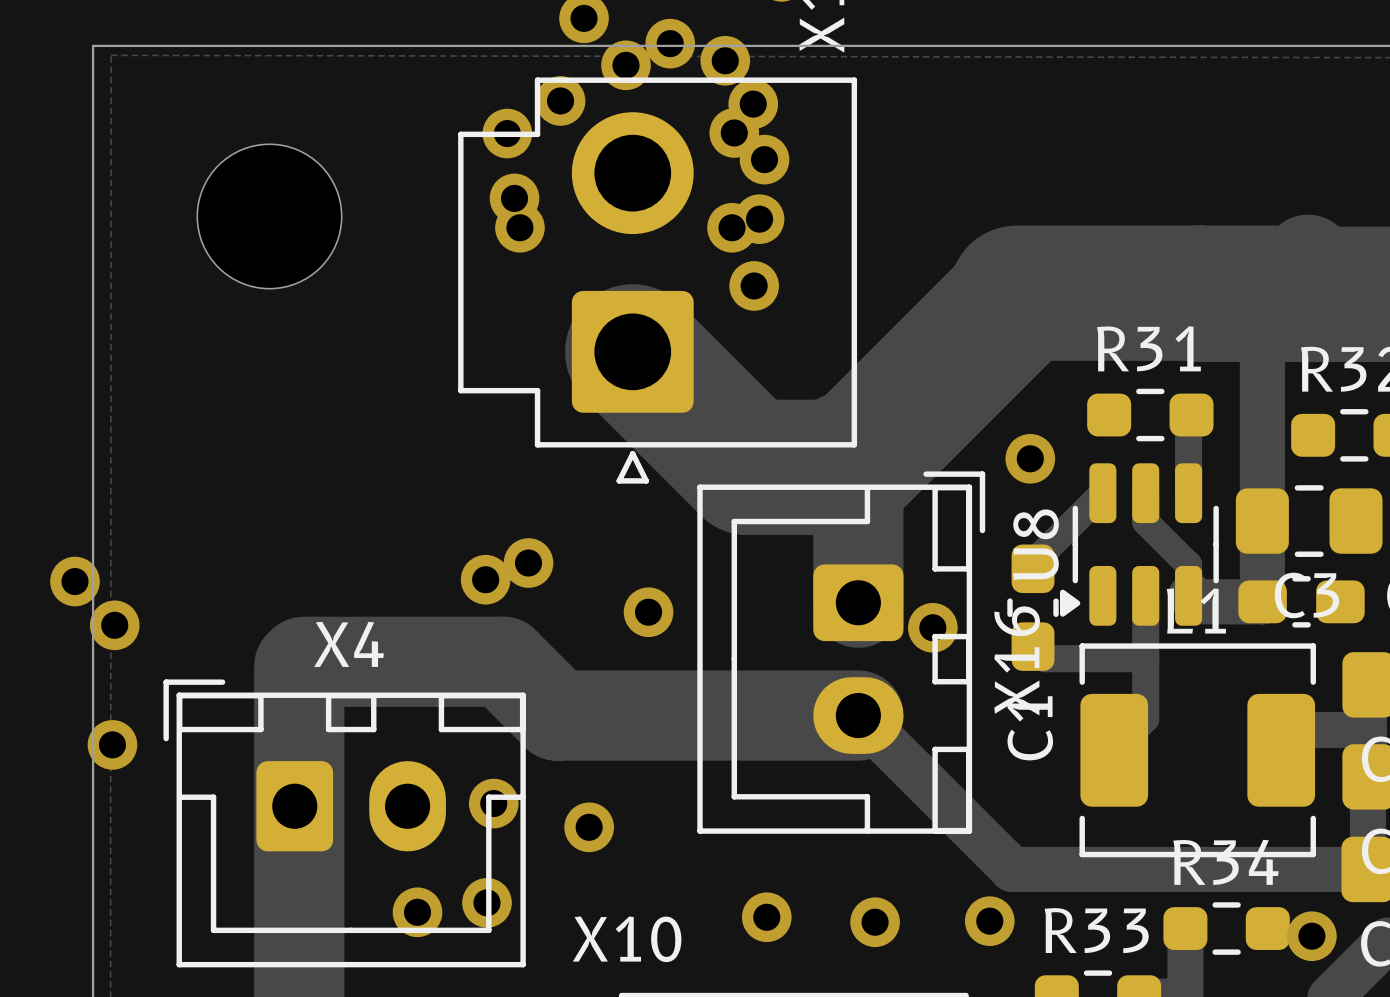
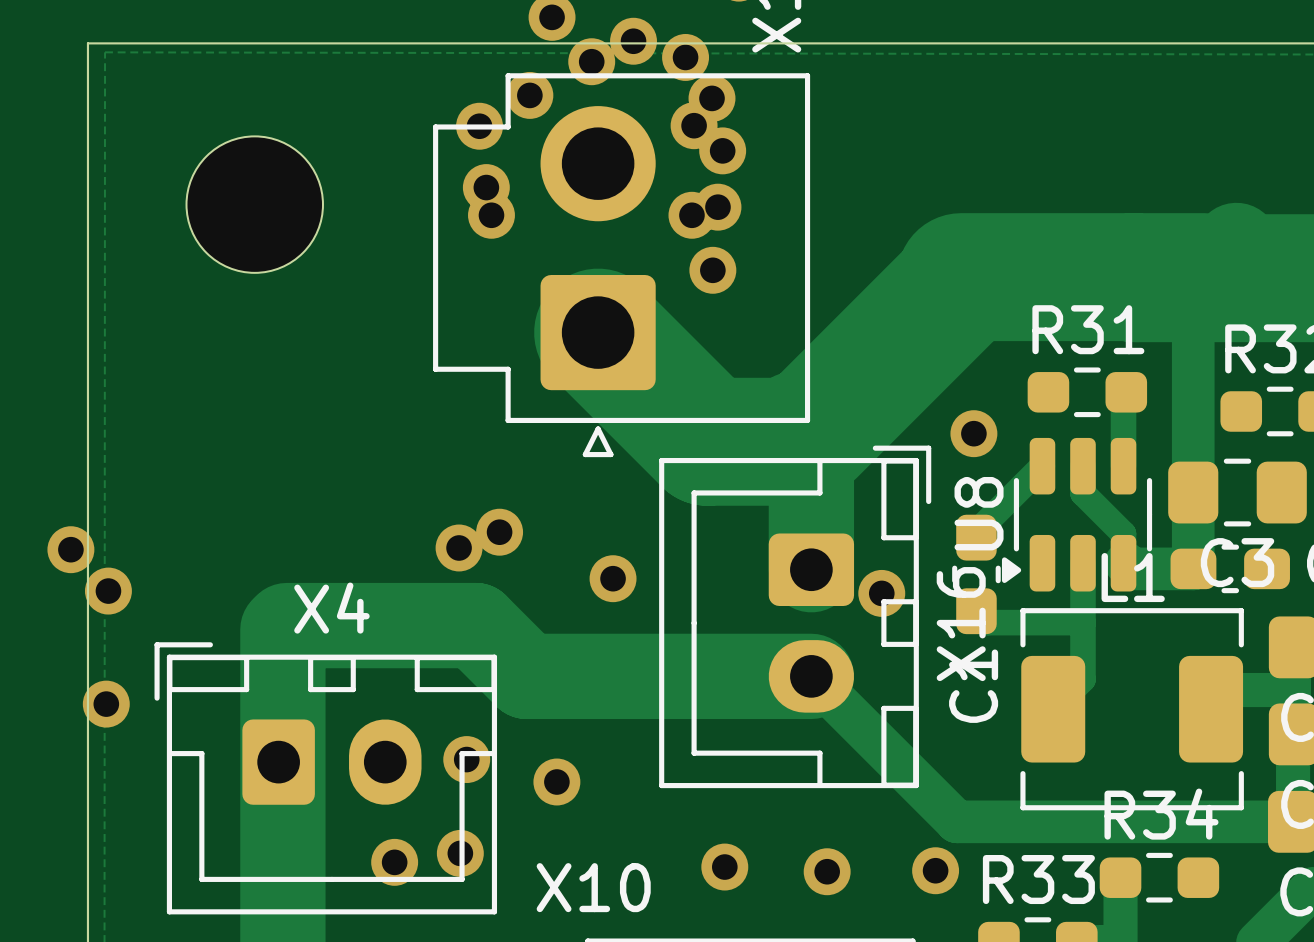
via: (1311, 936) -> none

